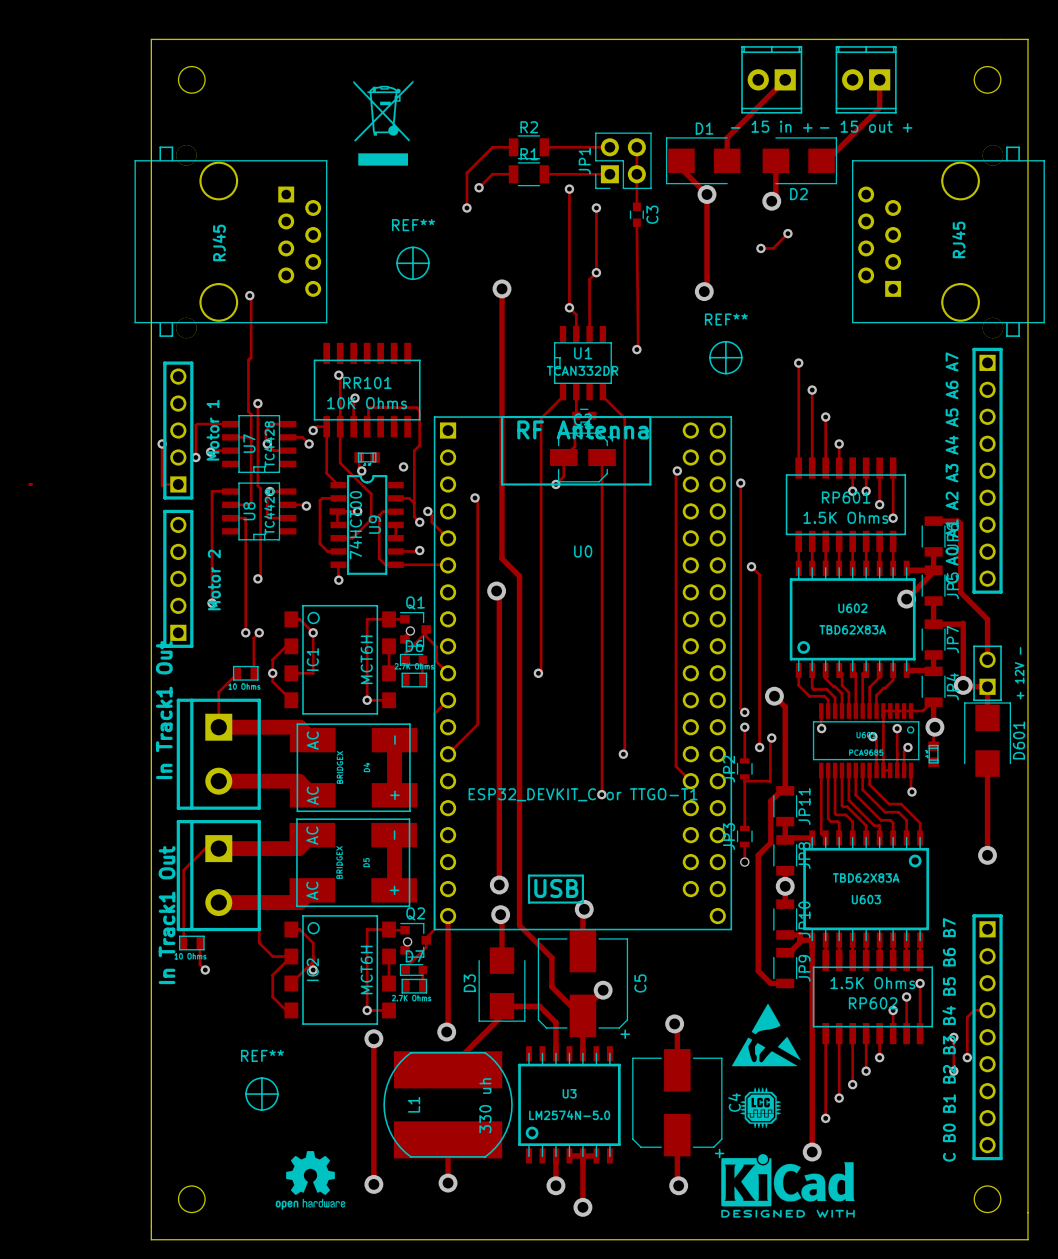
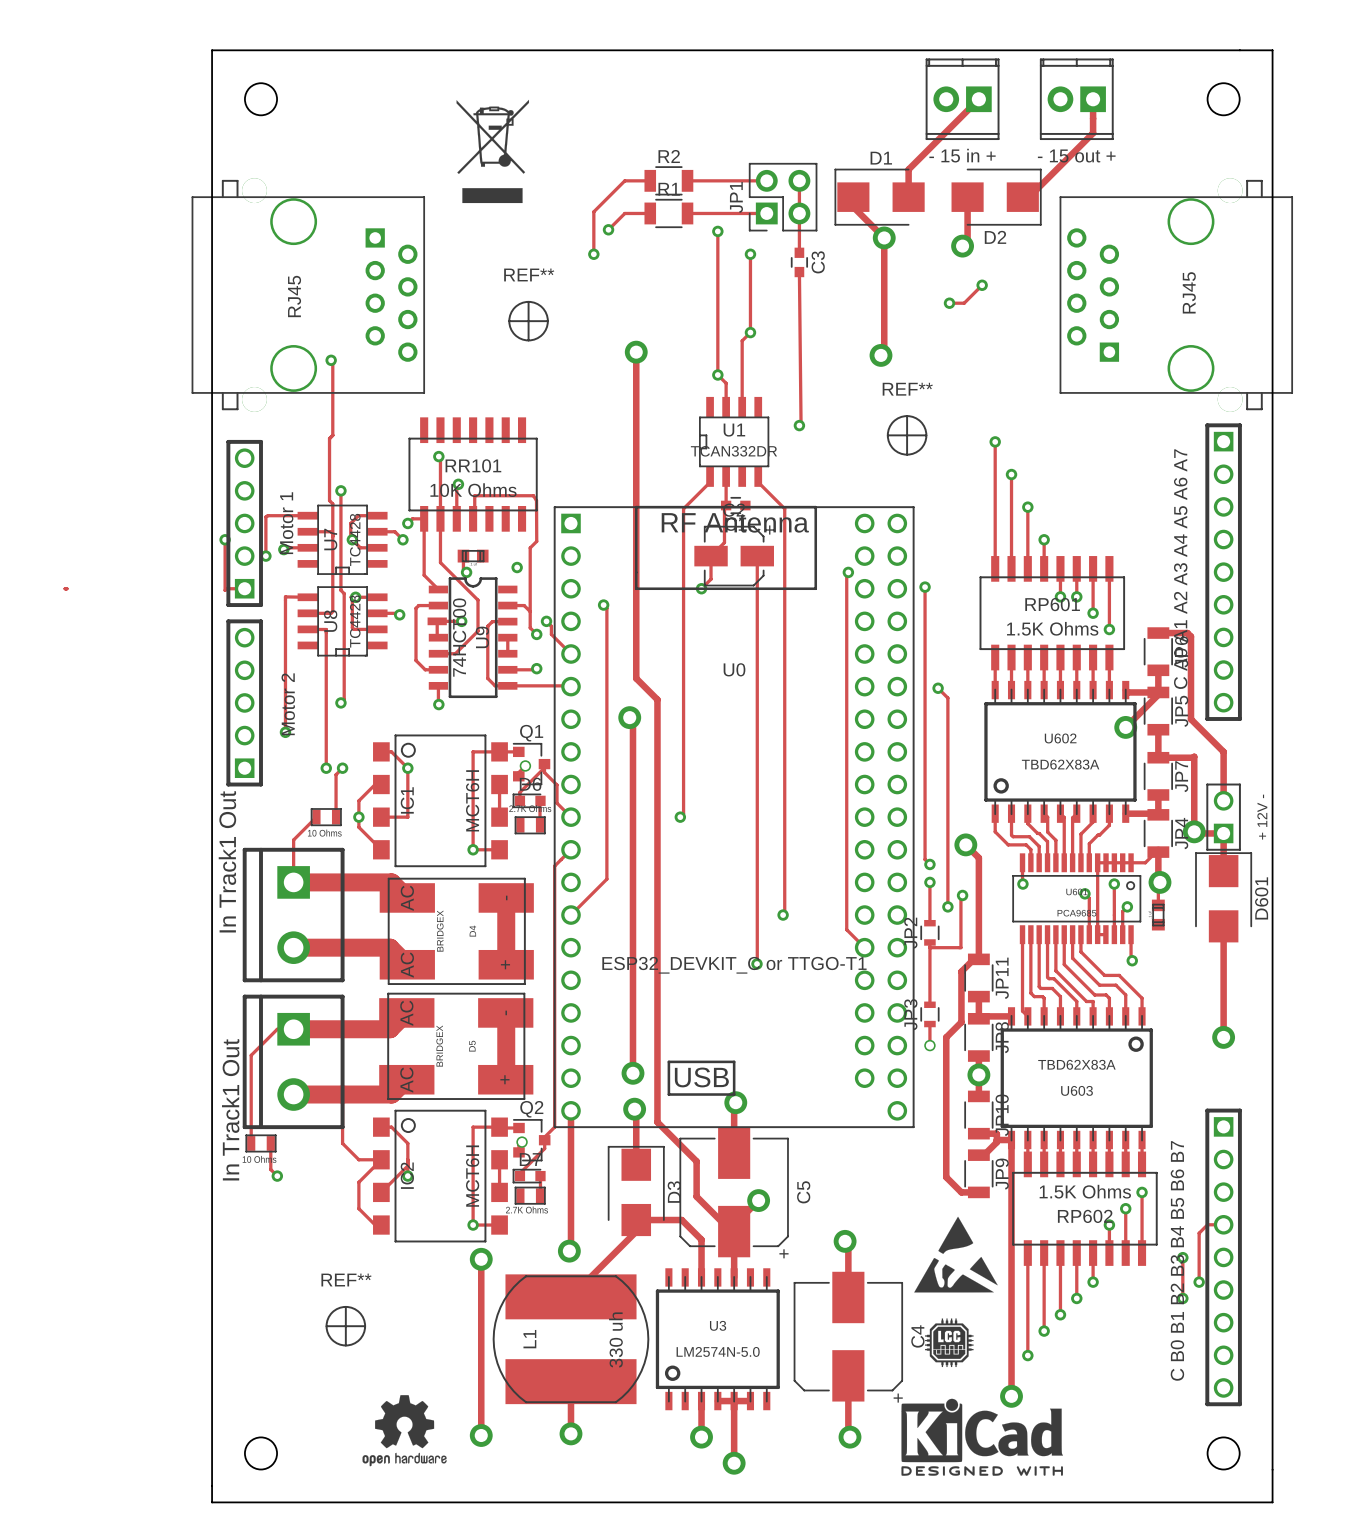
D3 rotation: 0° (502, 984) -> 180° (636, 1191)

